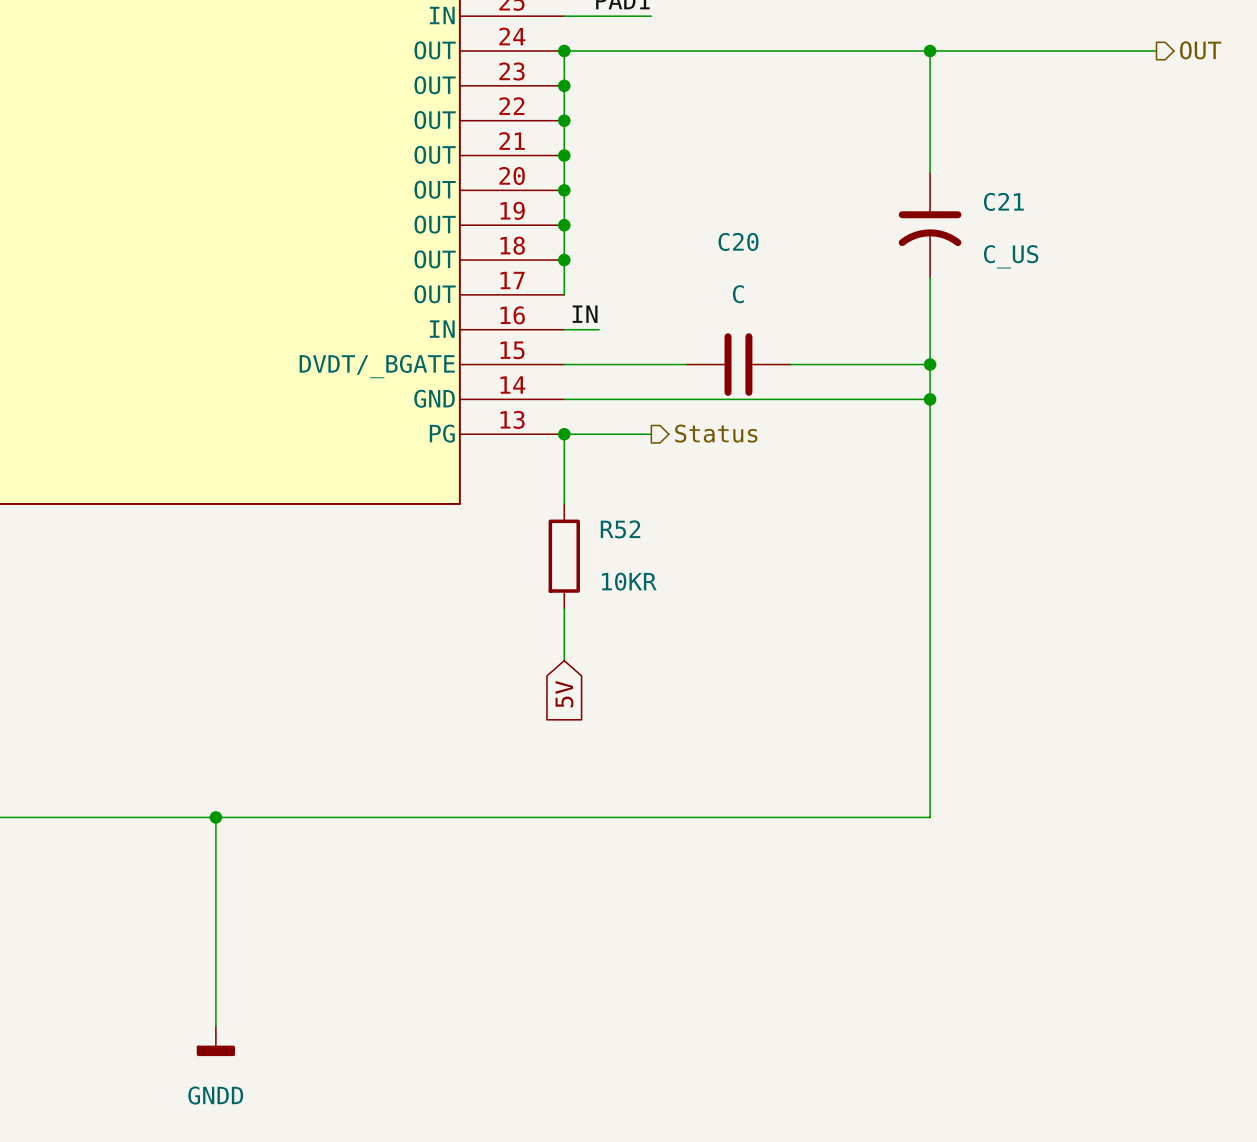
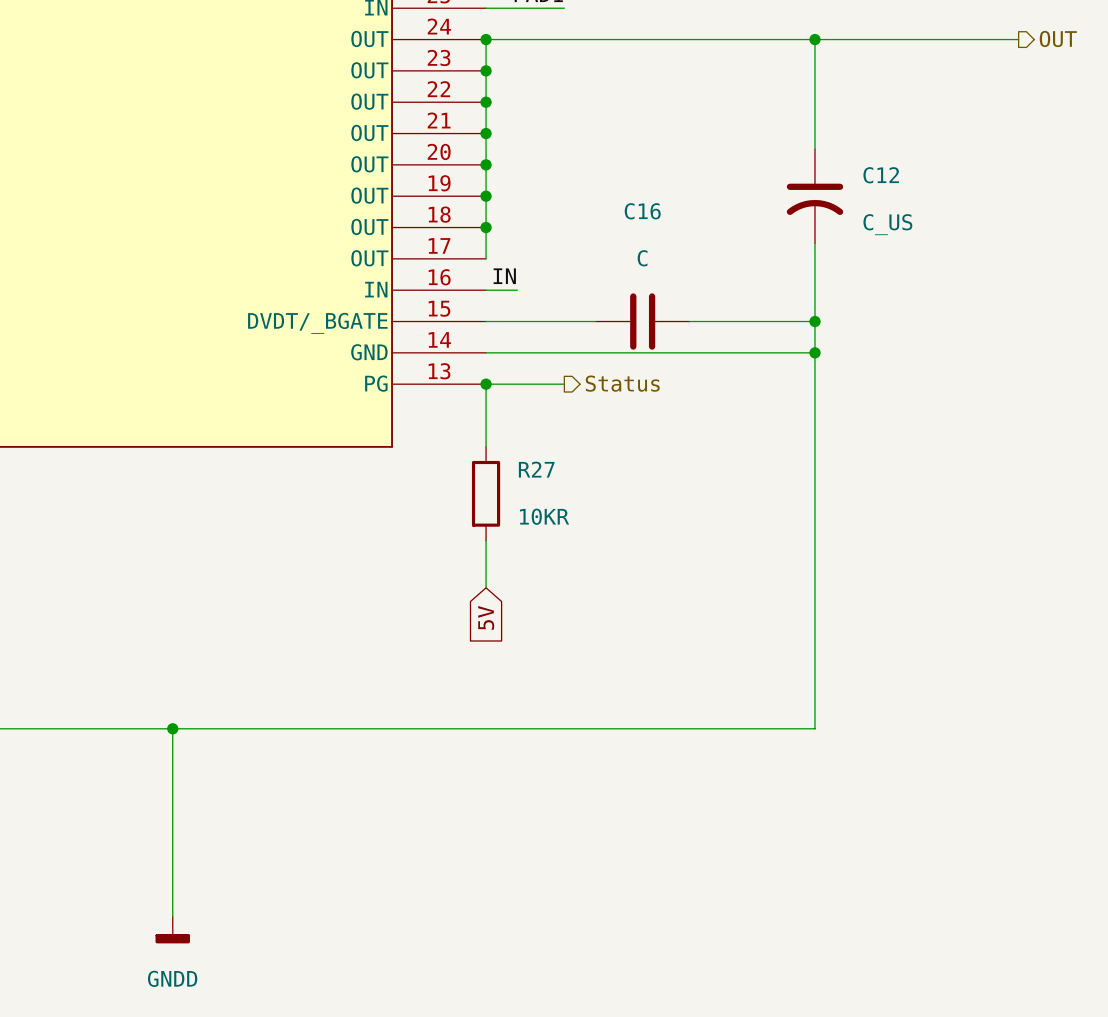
C21 name: C21 (1003, 201) -> C12 (881, 175)
C20 name: C20 (738, 241) -> C16 (642, 211)
R52 name: R52 (620, 529) -> R27 (536, 469)

